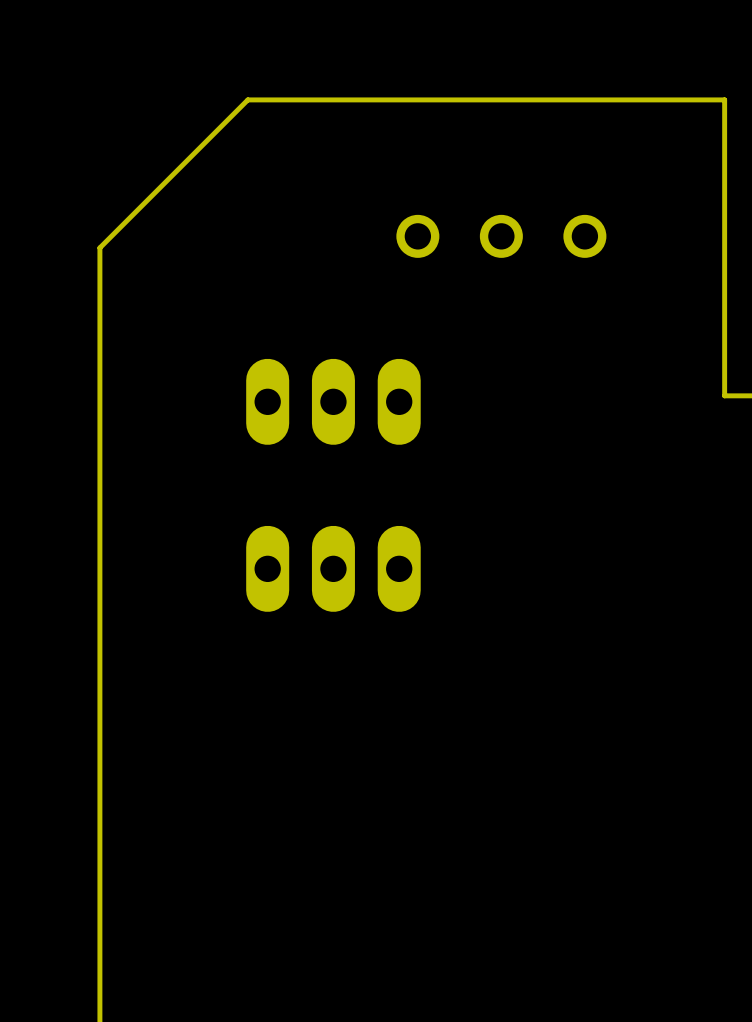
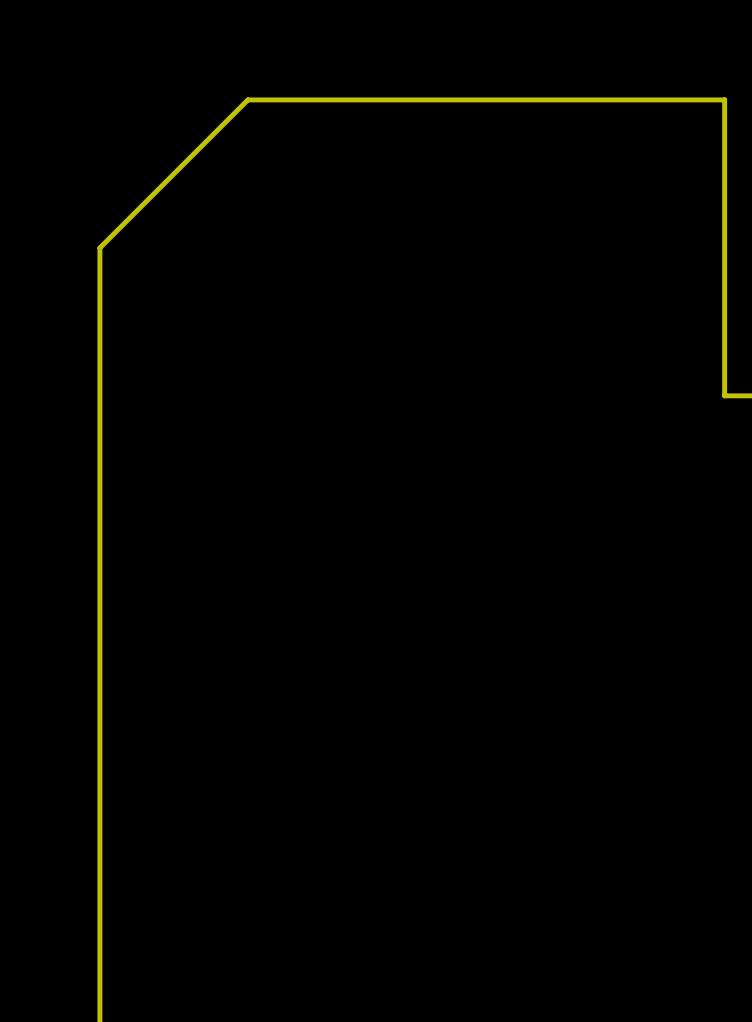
part: (501, 236) -> none
part: (333, 401) -> none
part: (333, 568) -> none

